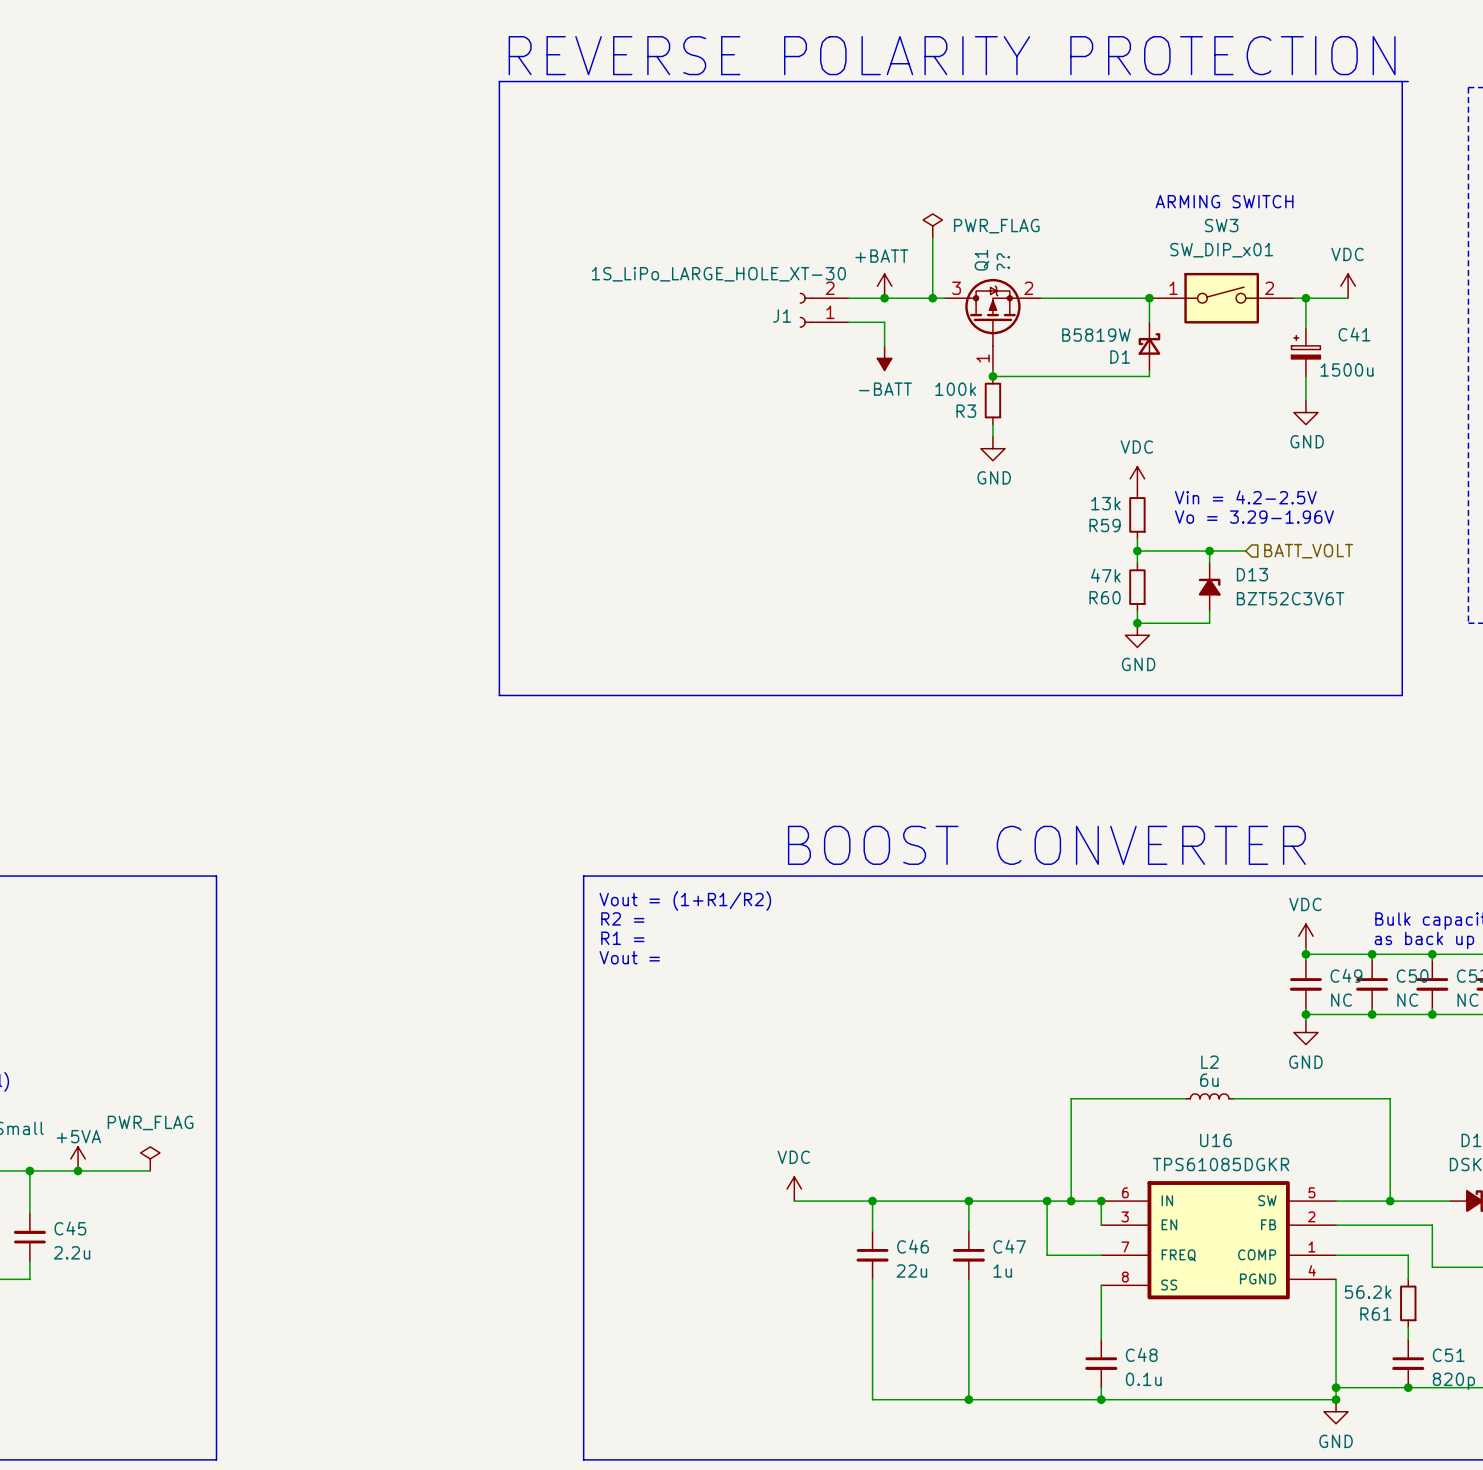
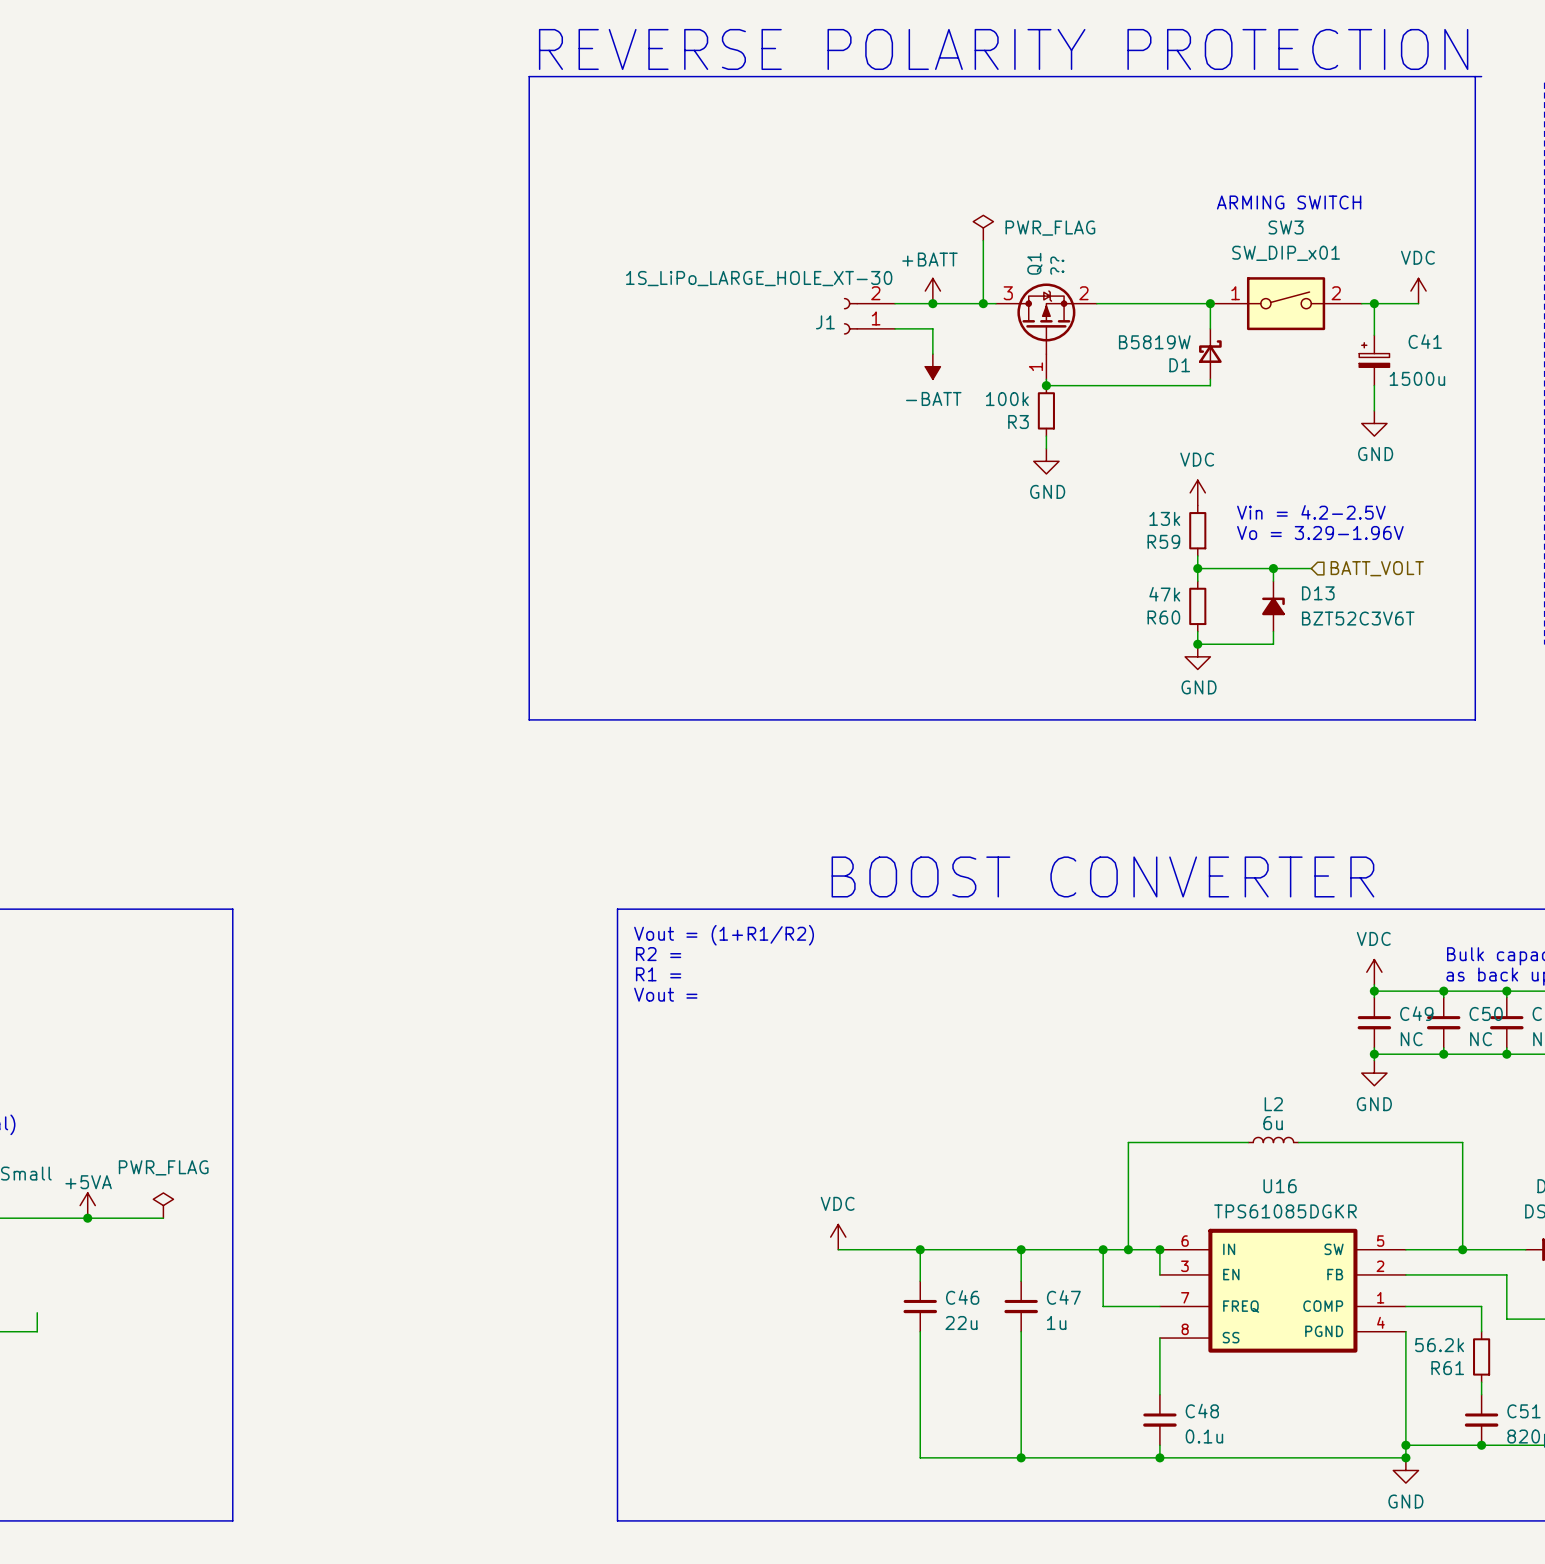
wire: (29, 1170) (29, 1213) -> none
junction: (29, 1170) -> none
C45: 2.2u (29, 1237) -> none

